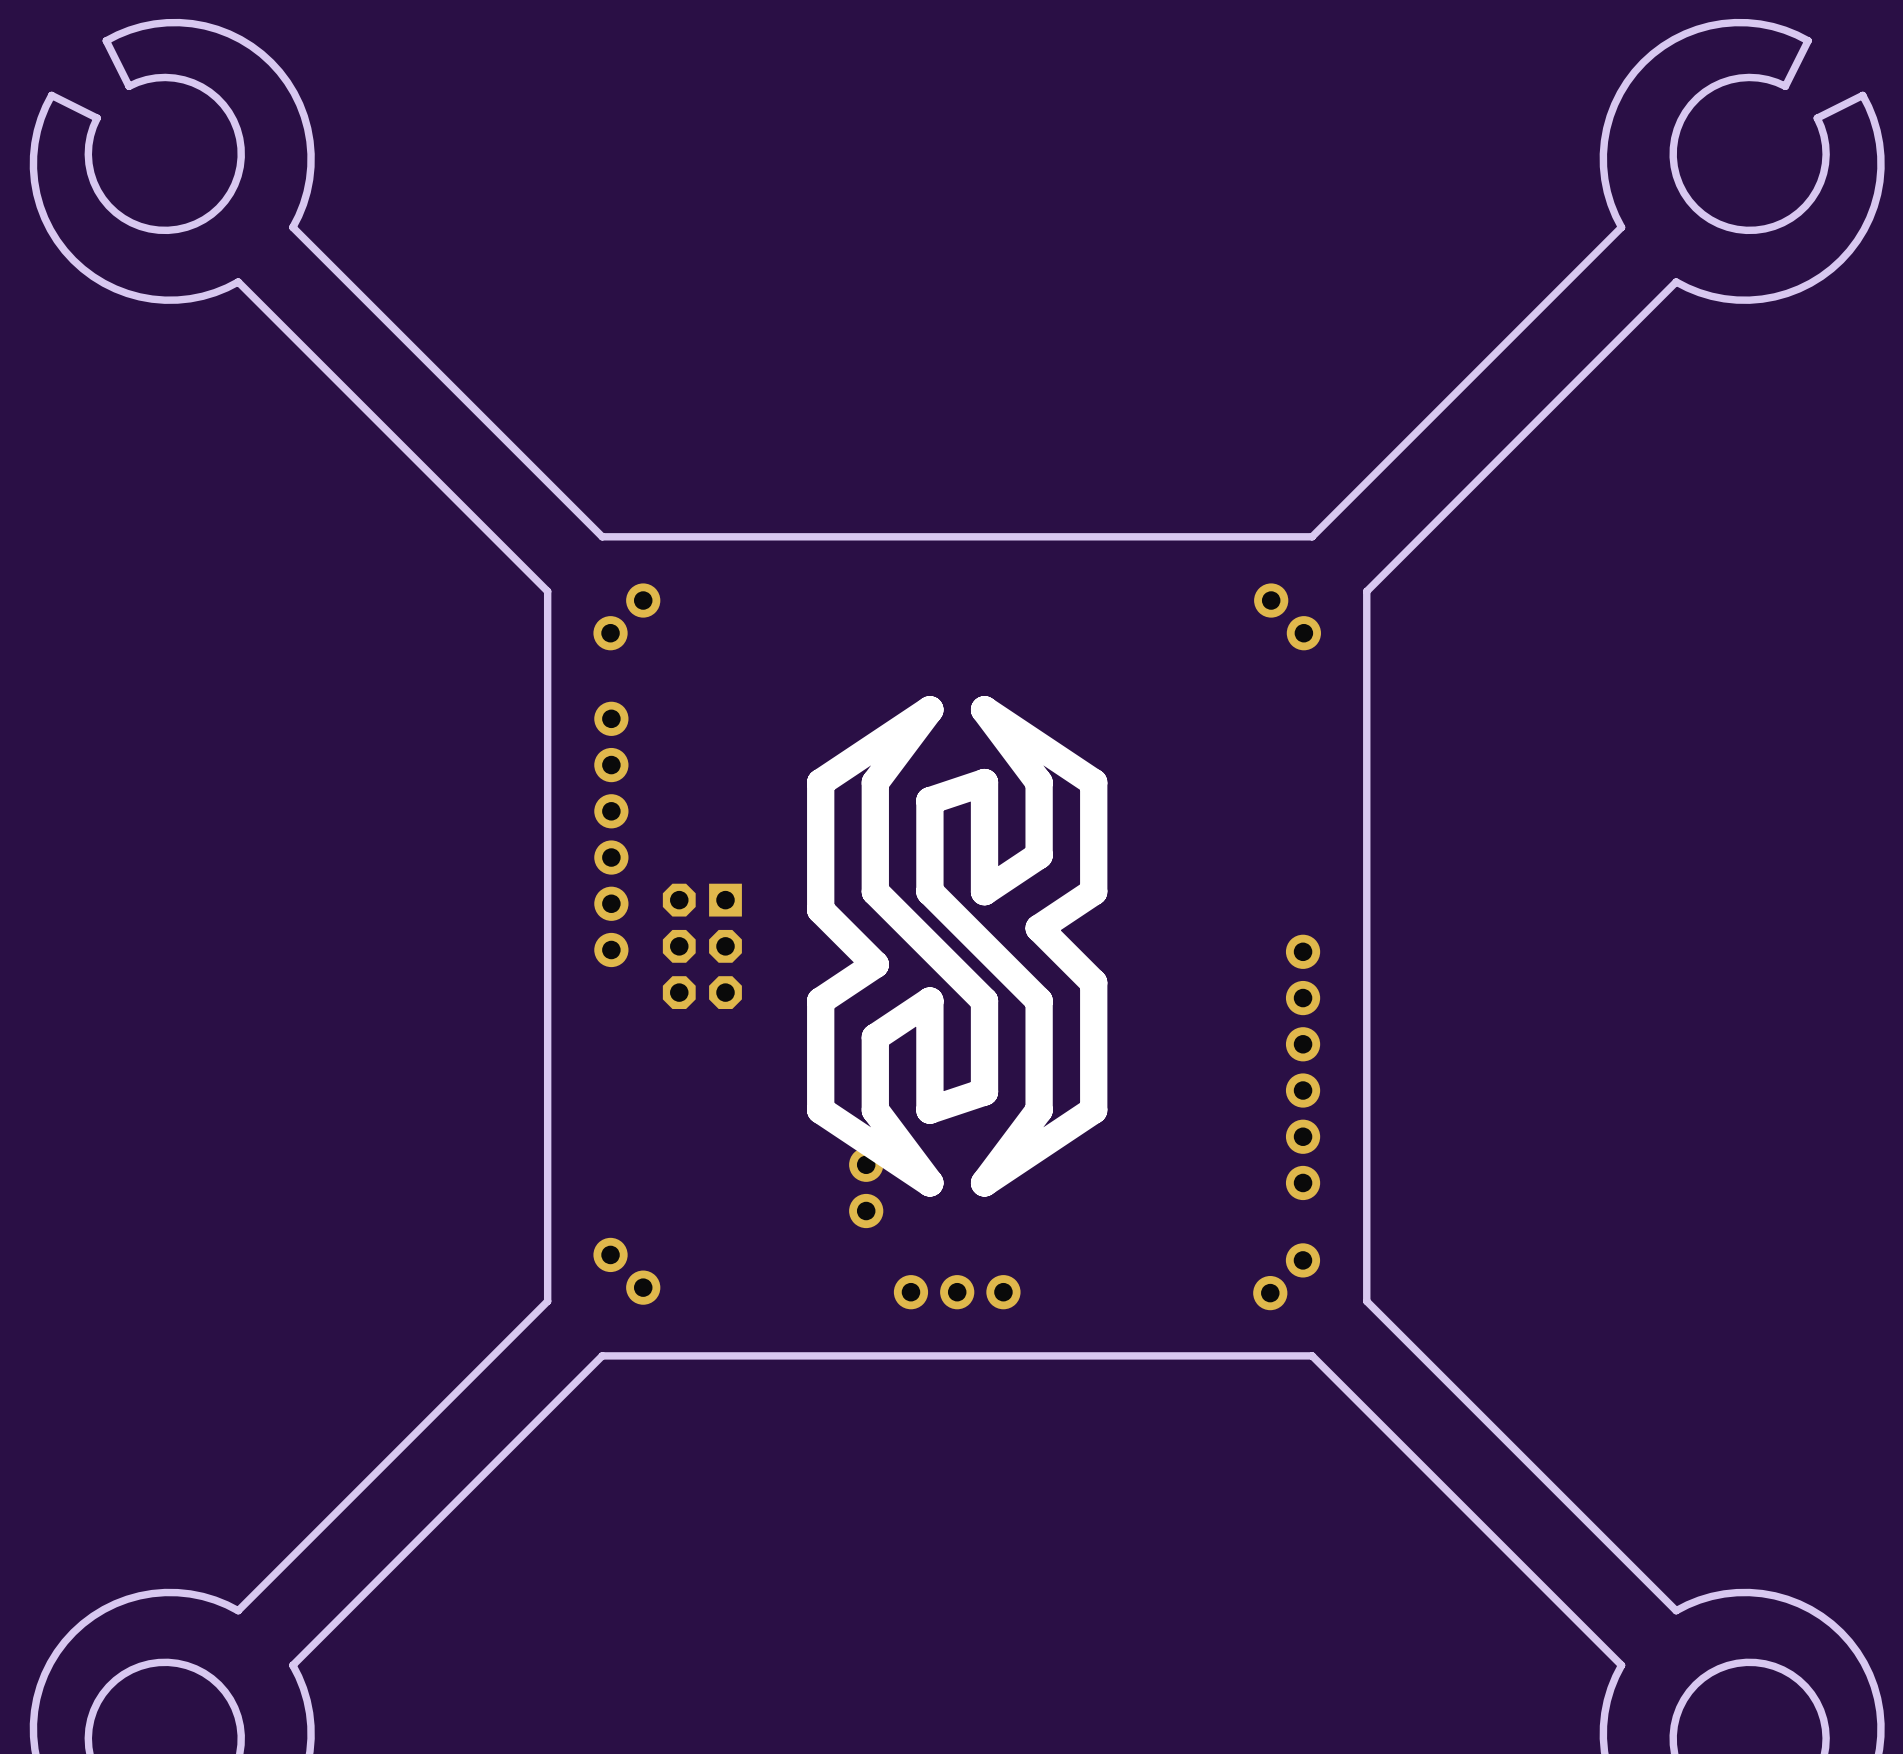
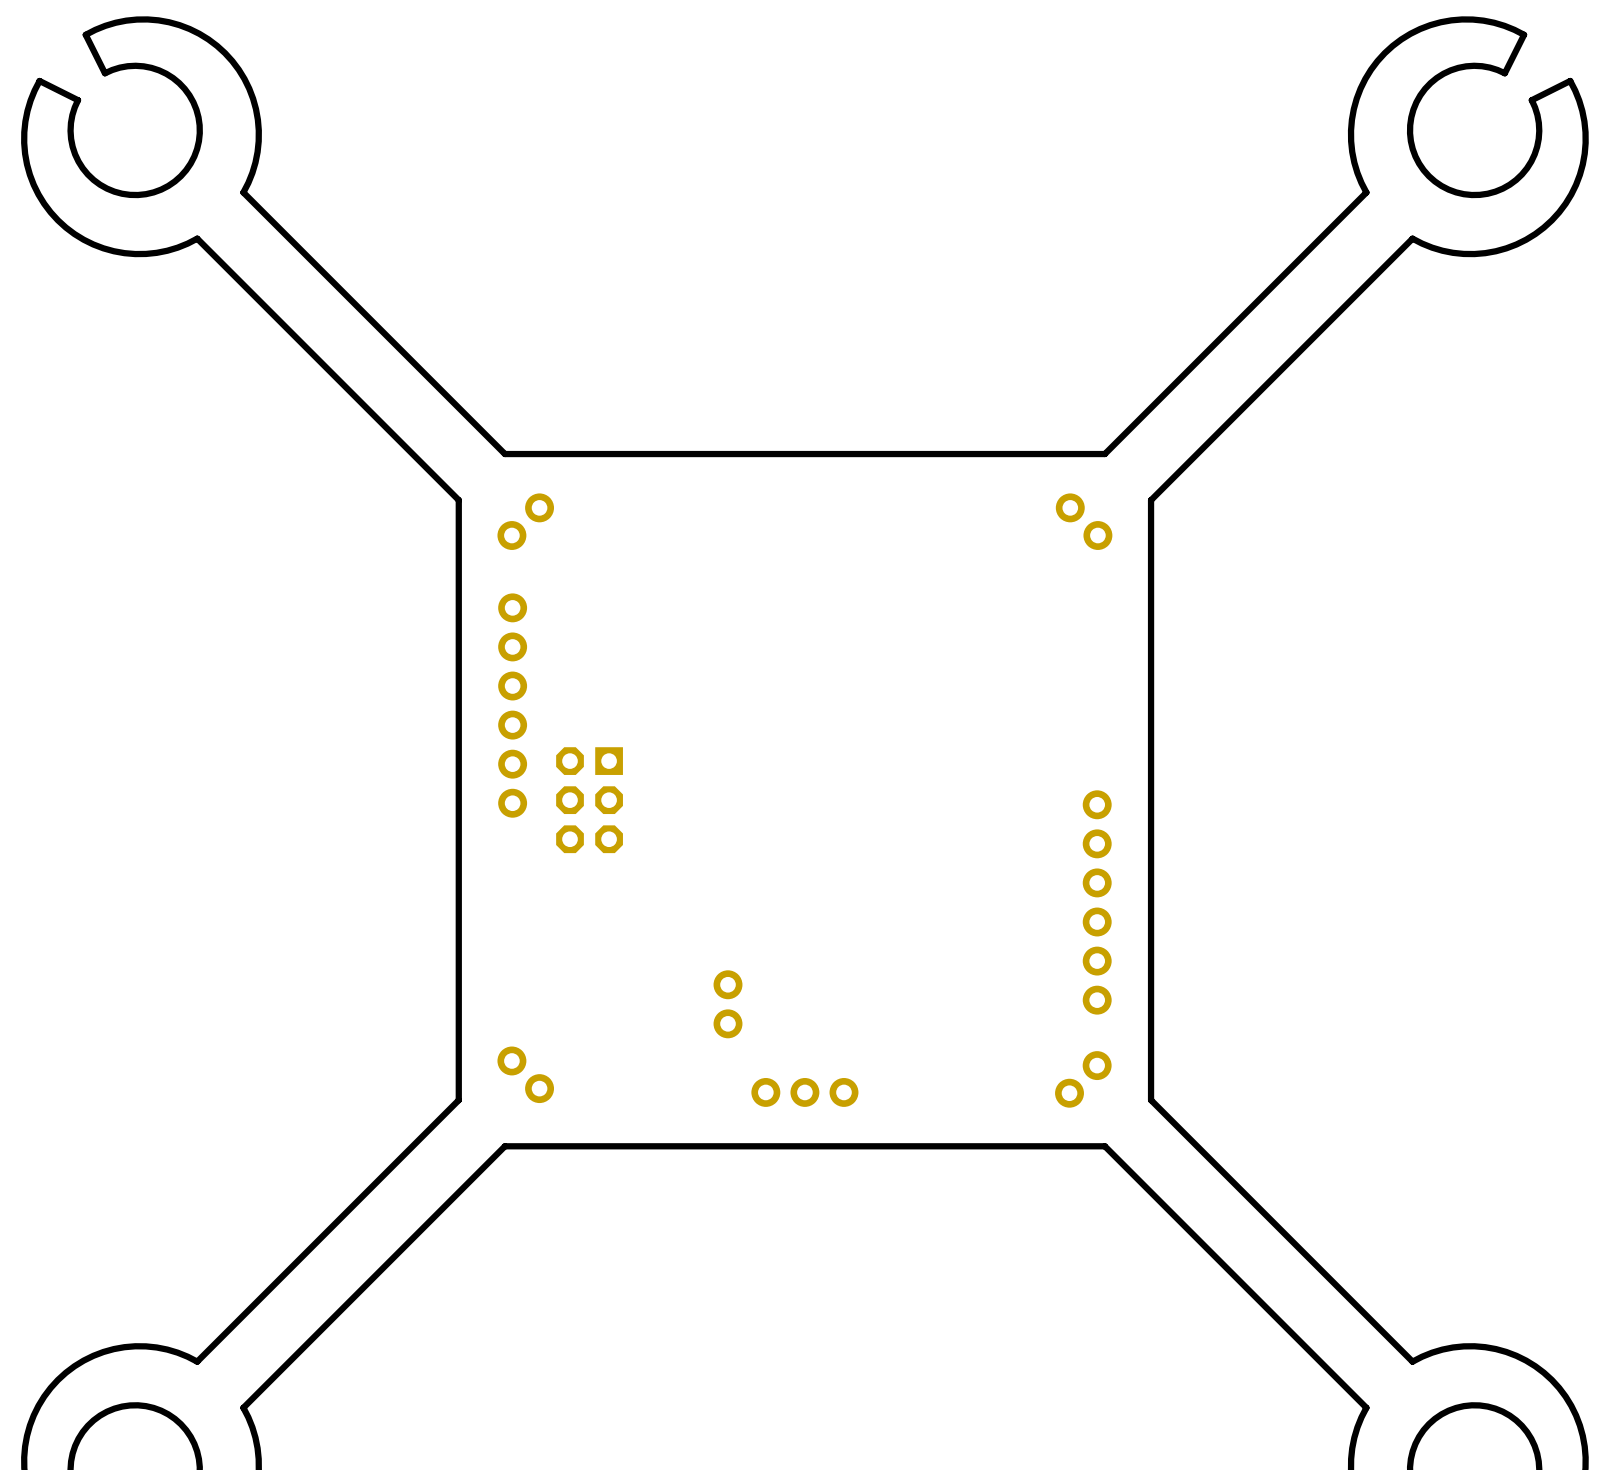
drawing: [807, 696, 1108, 1197] -> none

